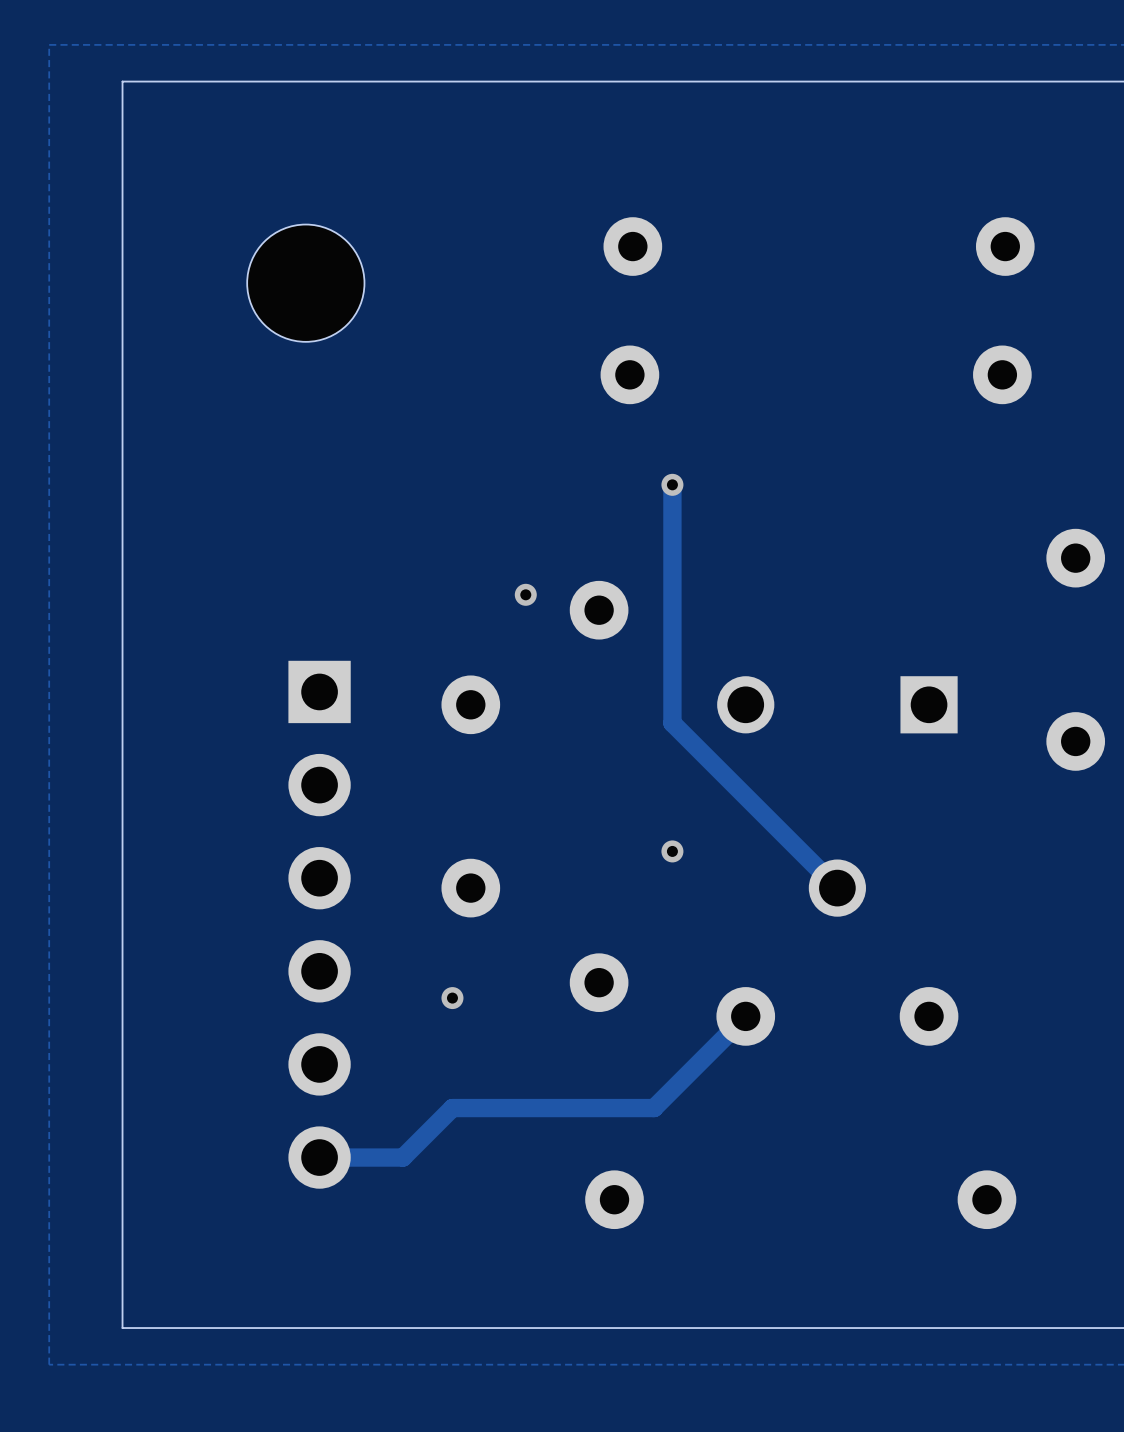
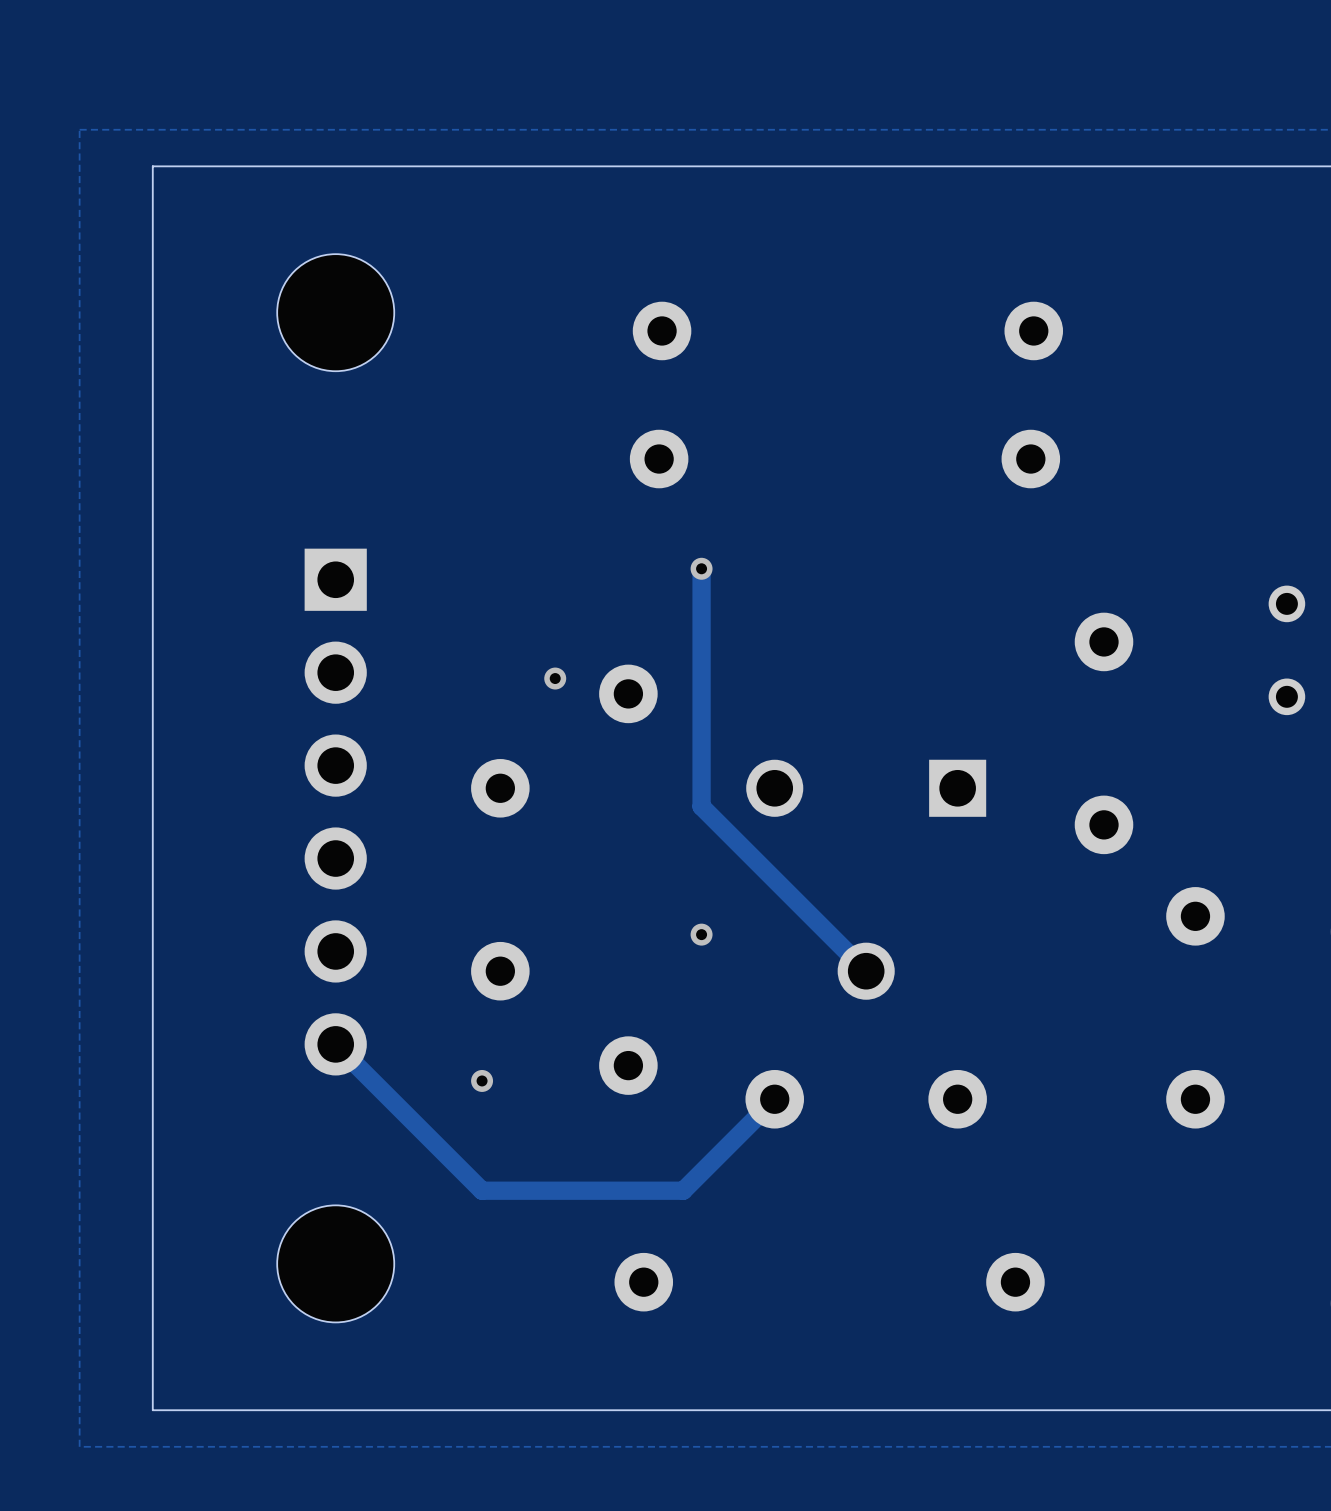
part position: (305, 283) -> (335, 312)
part position: (319, 924) -> (335, 812)
track: (452, 1108) (402, 1157) (319, 1157) -> (482, 1190) (335, 1044)
part: none -> (335, 1263)

